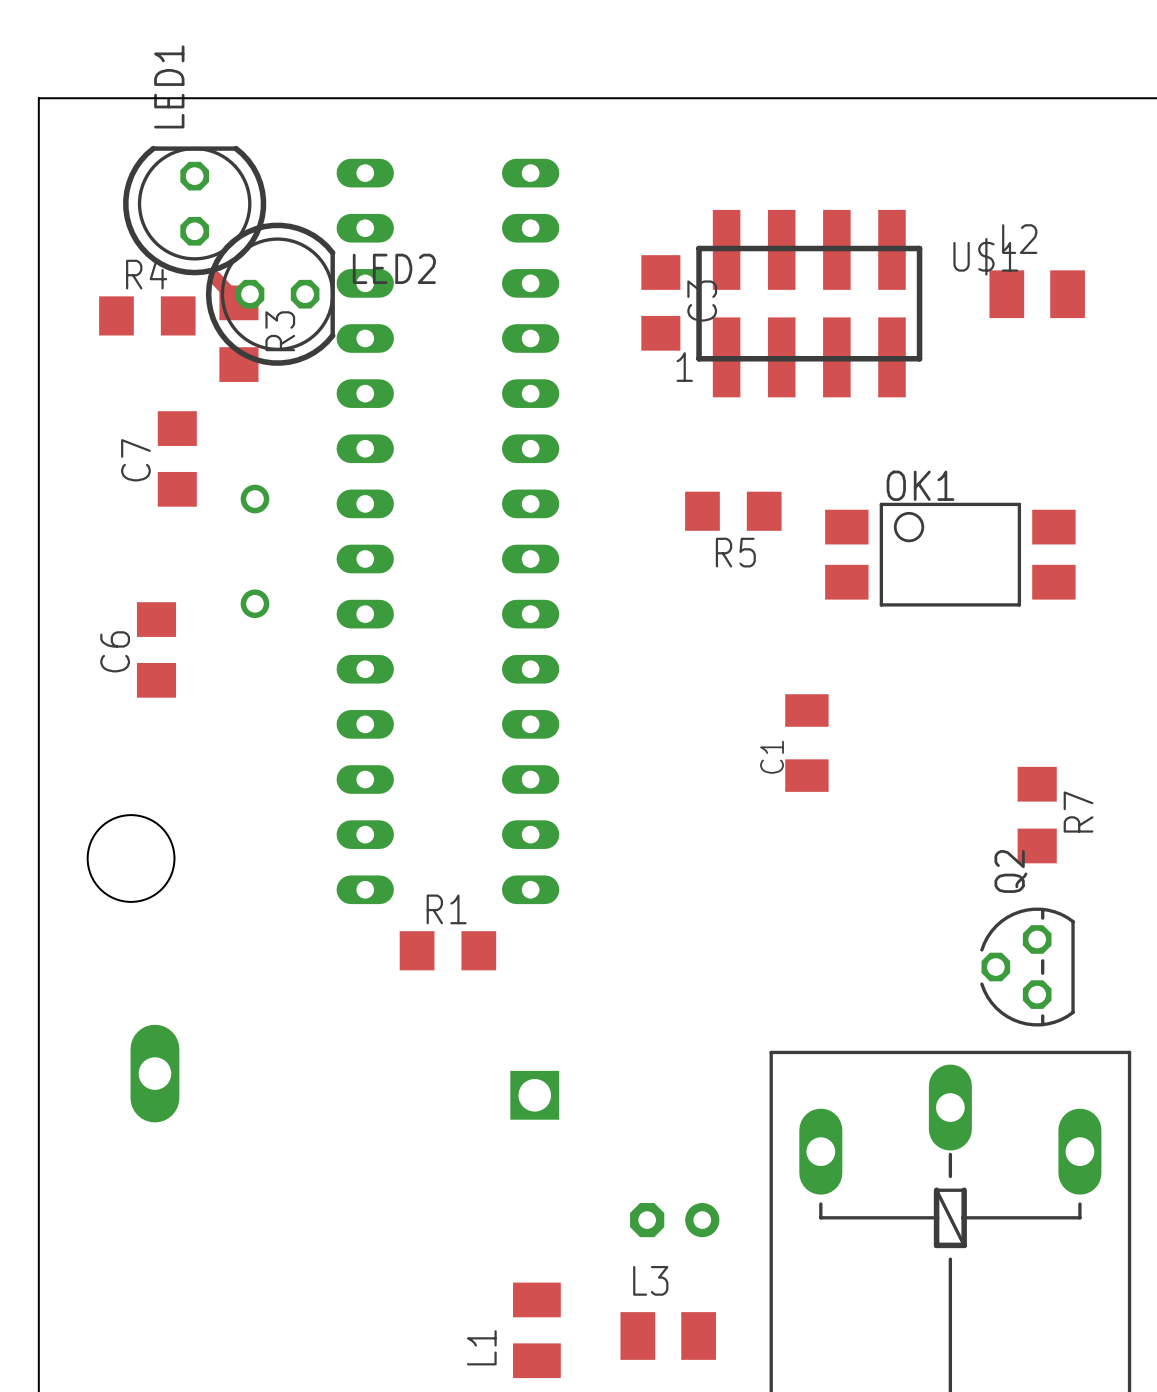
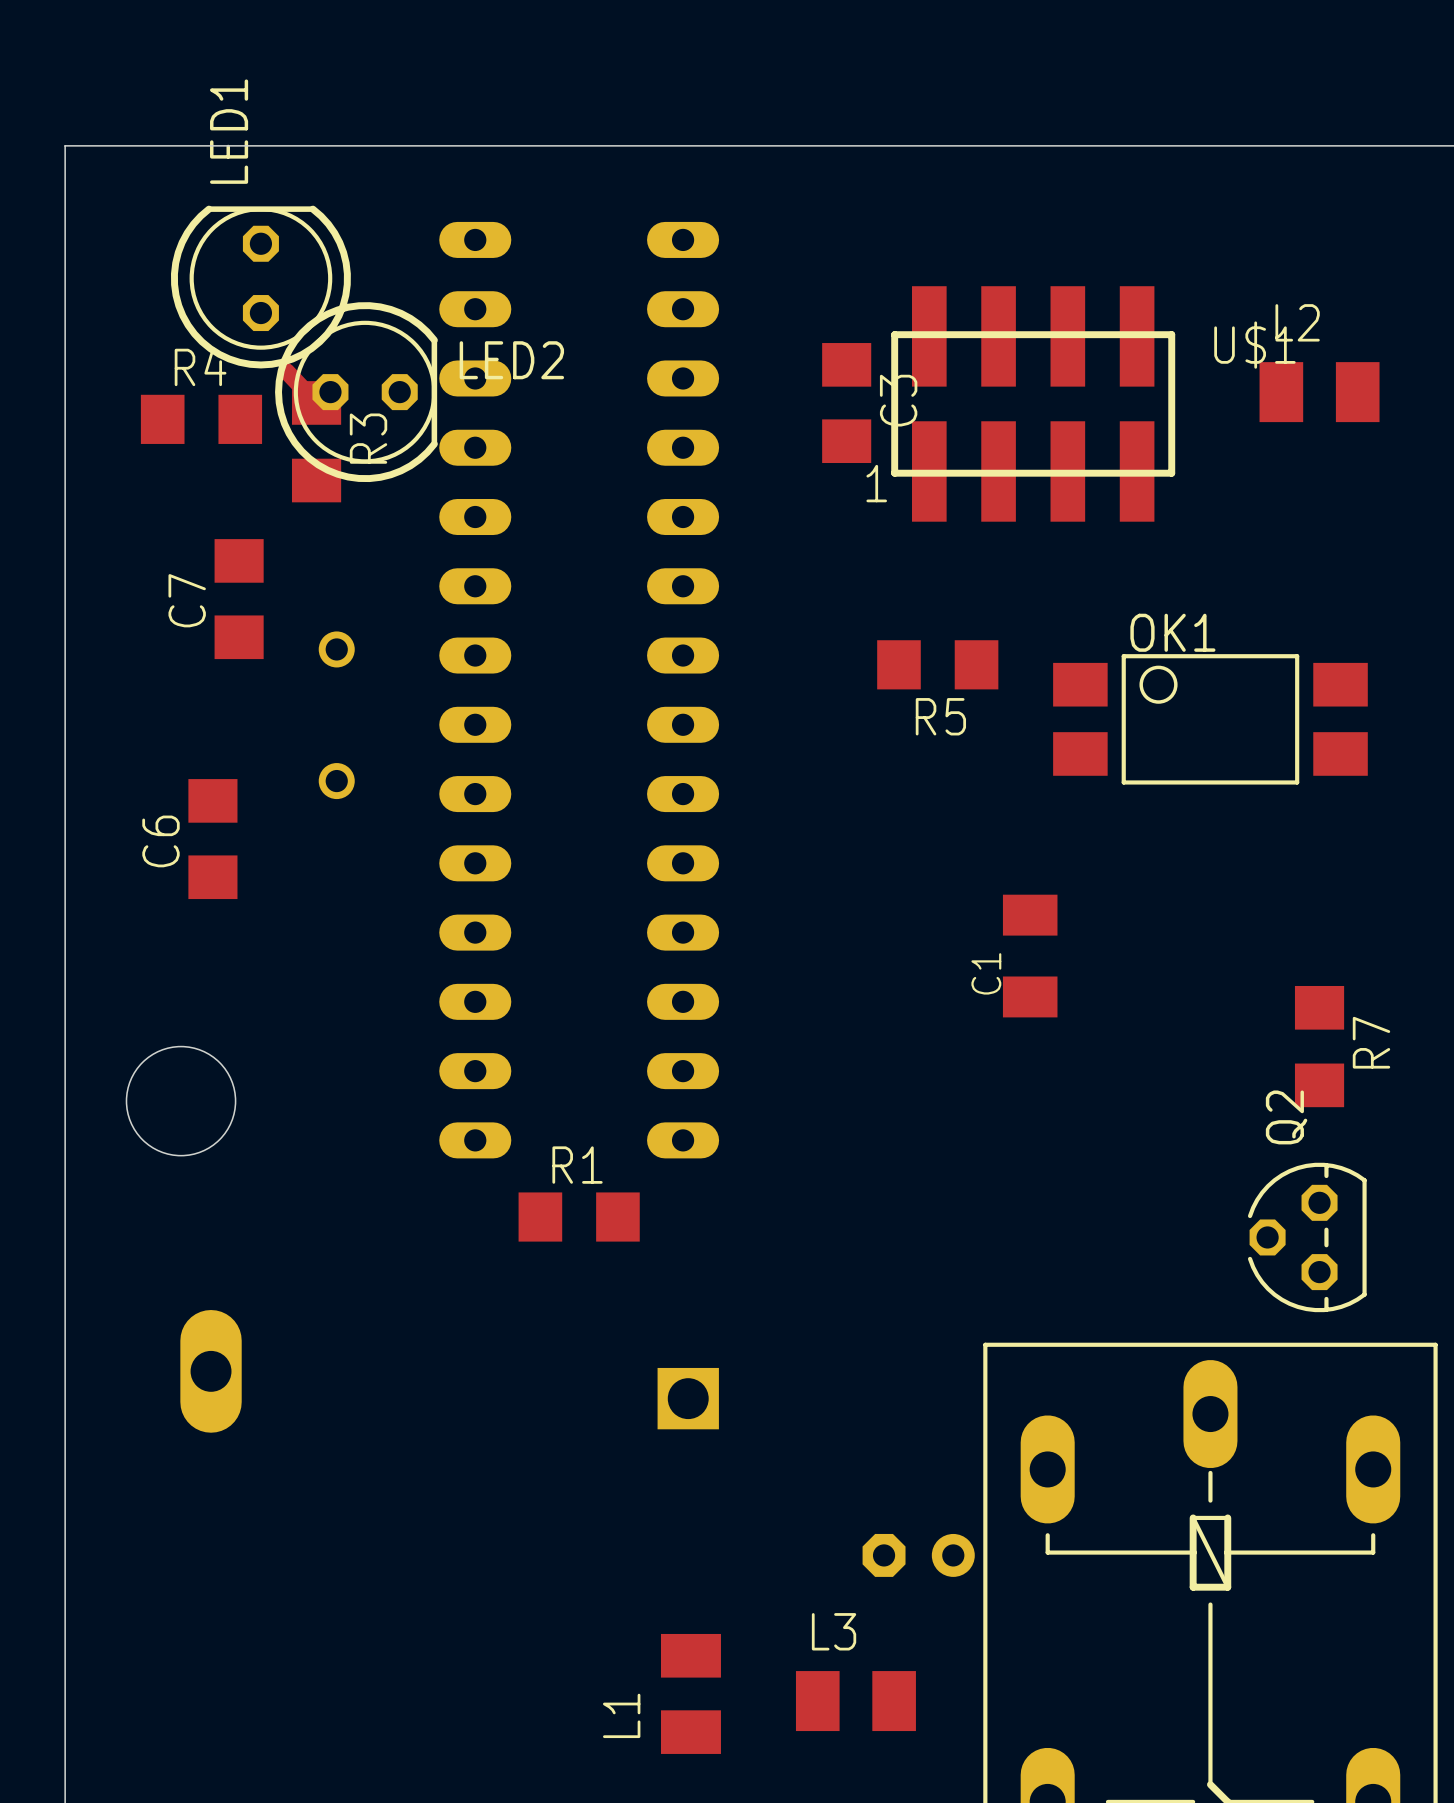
part position: (674, 1220) -> (918, 1555)

